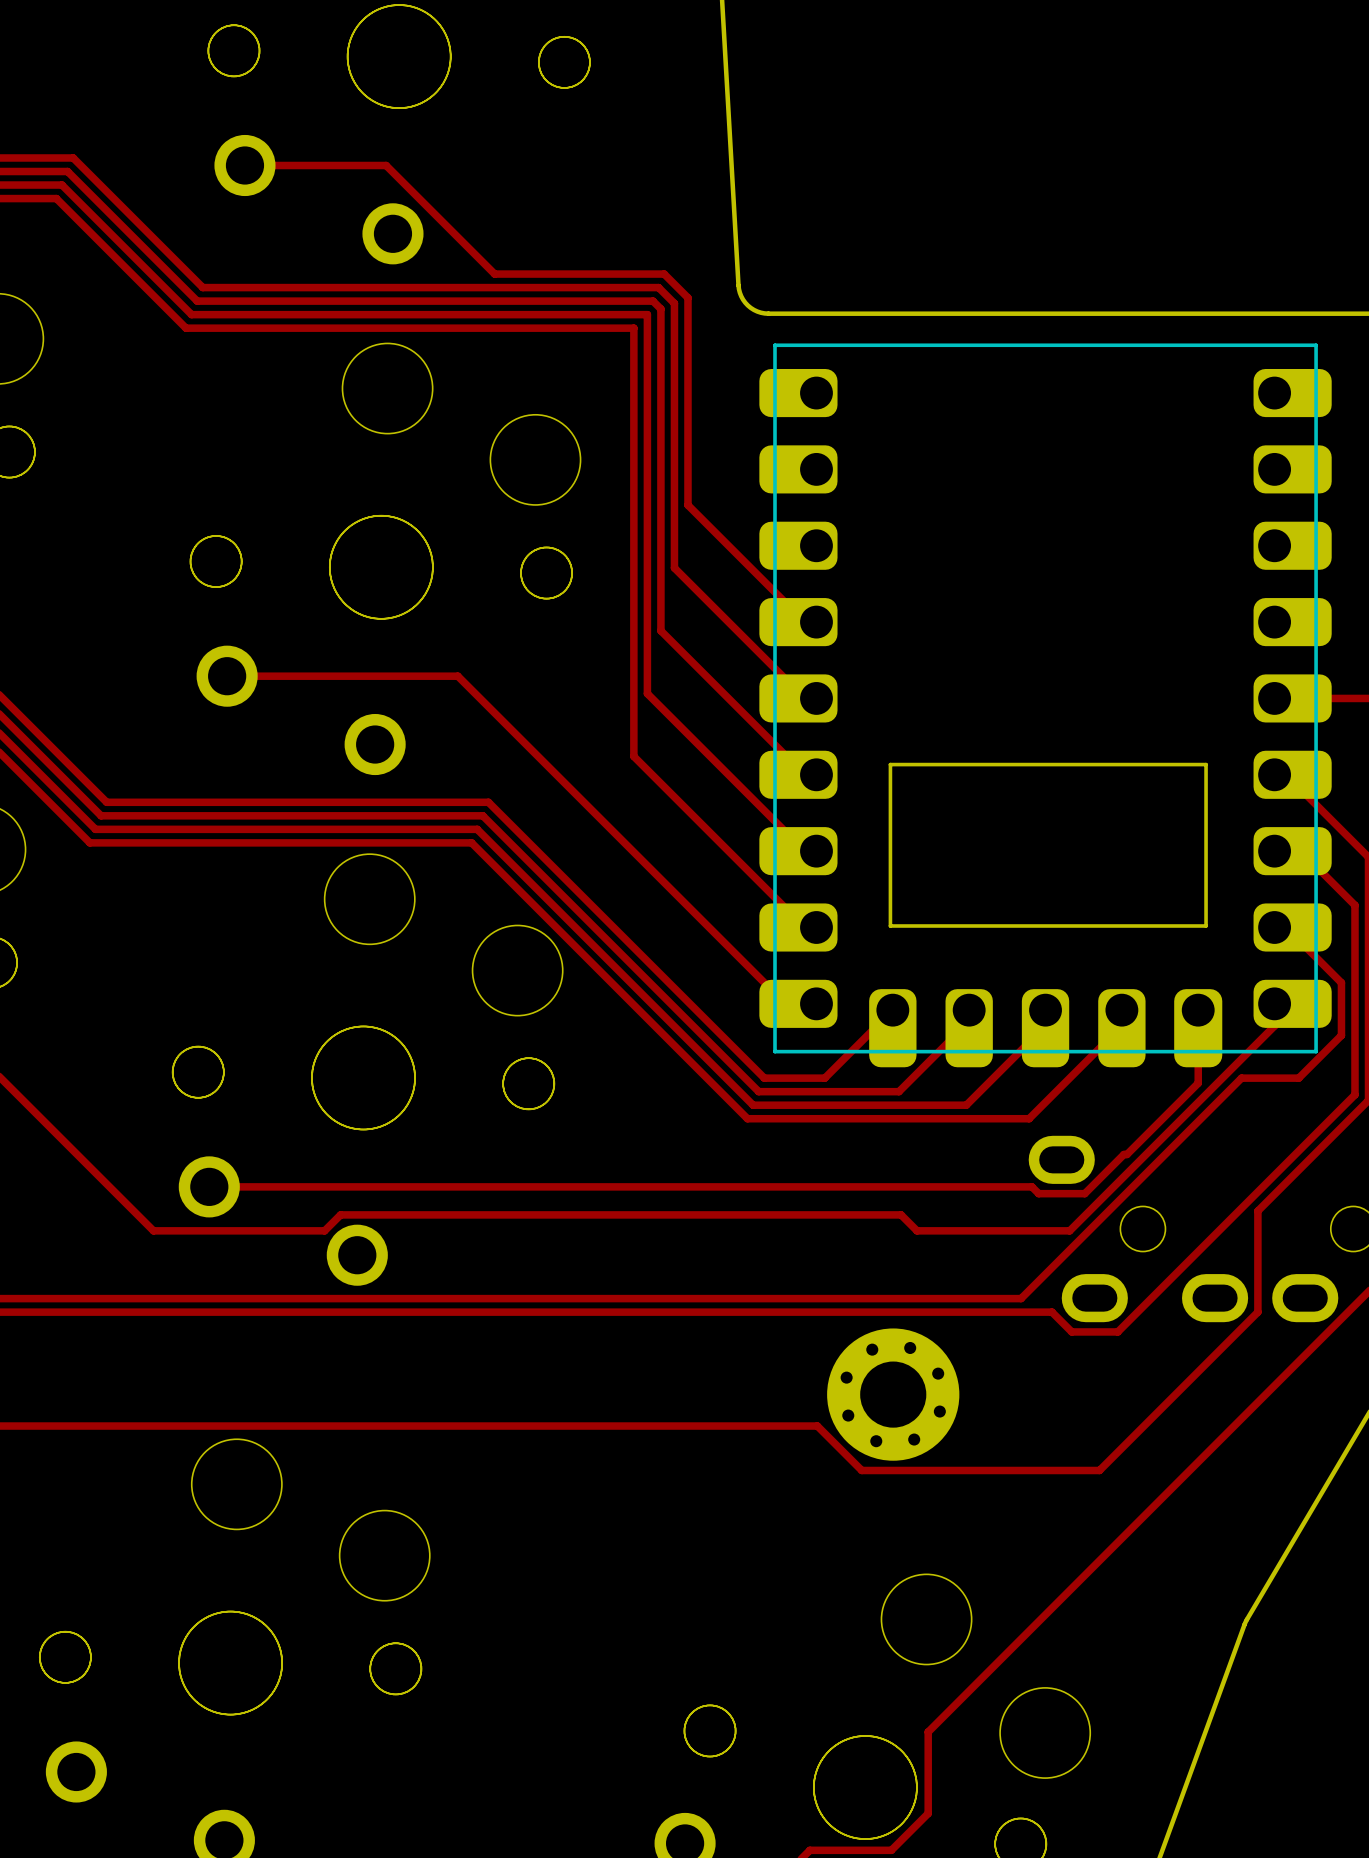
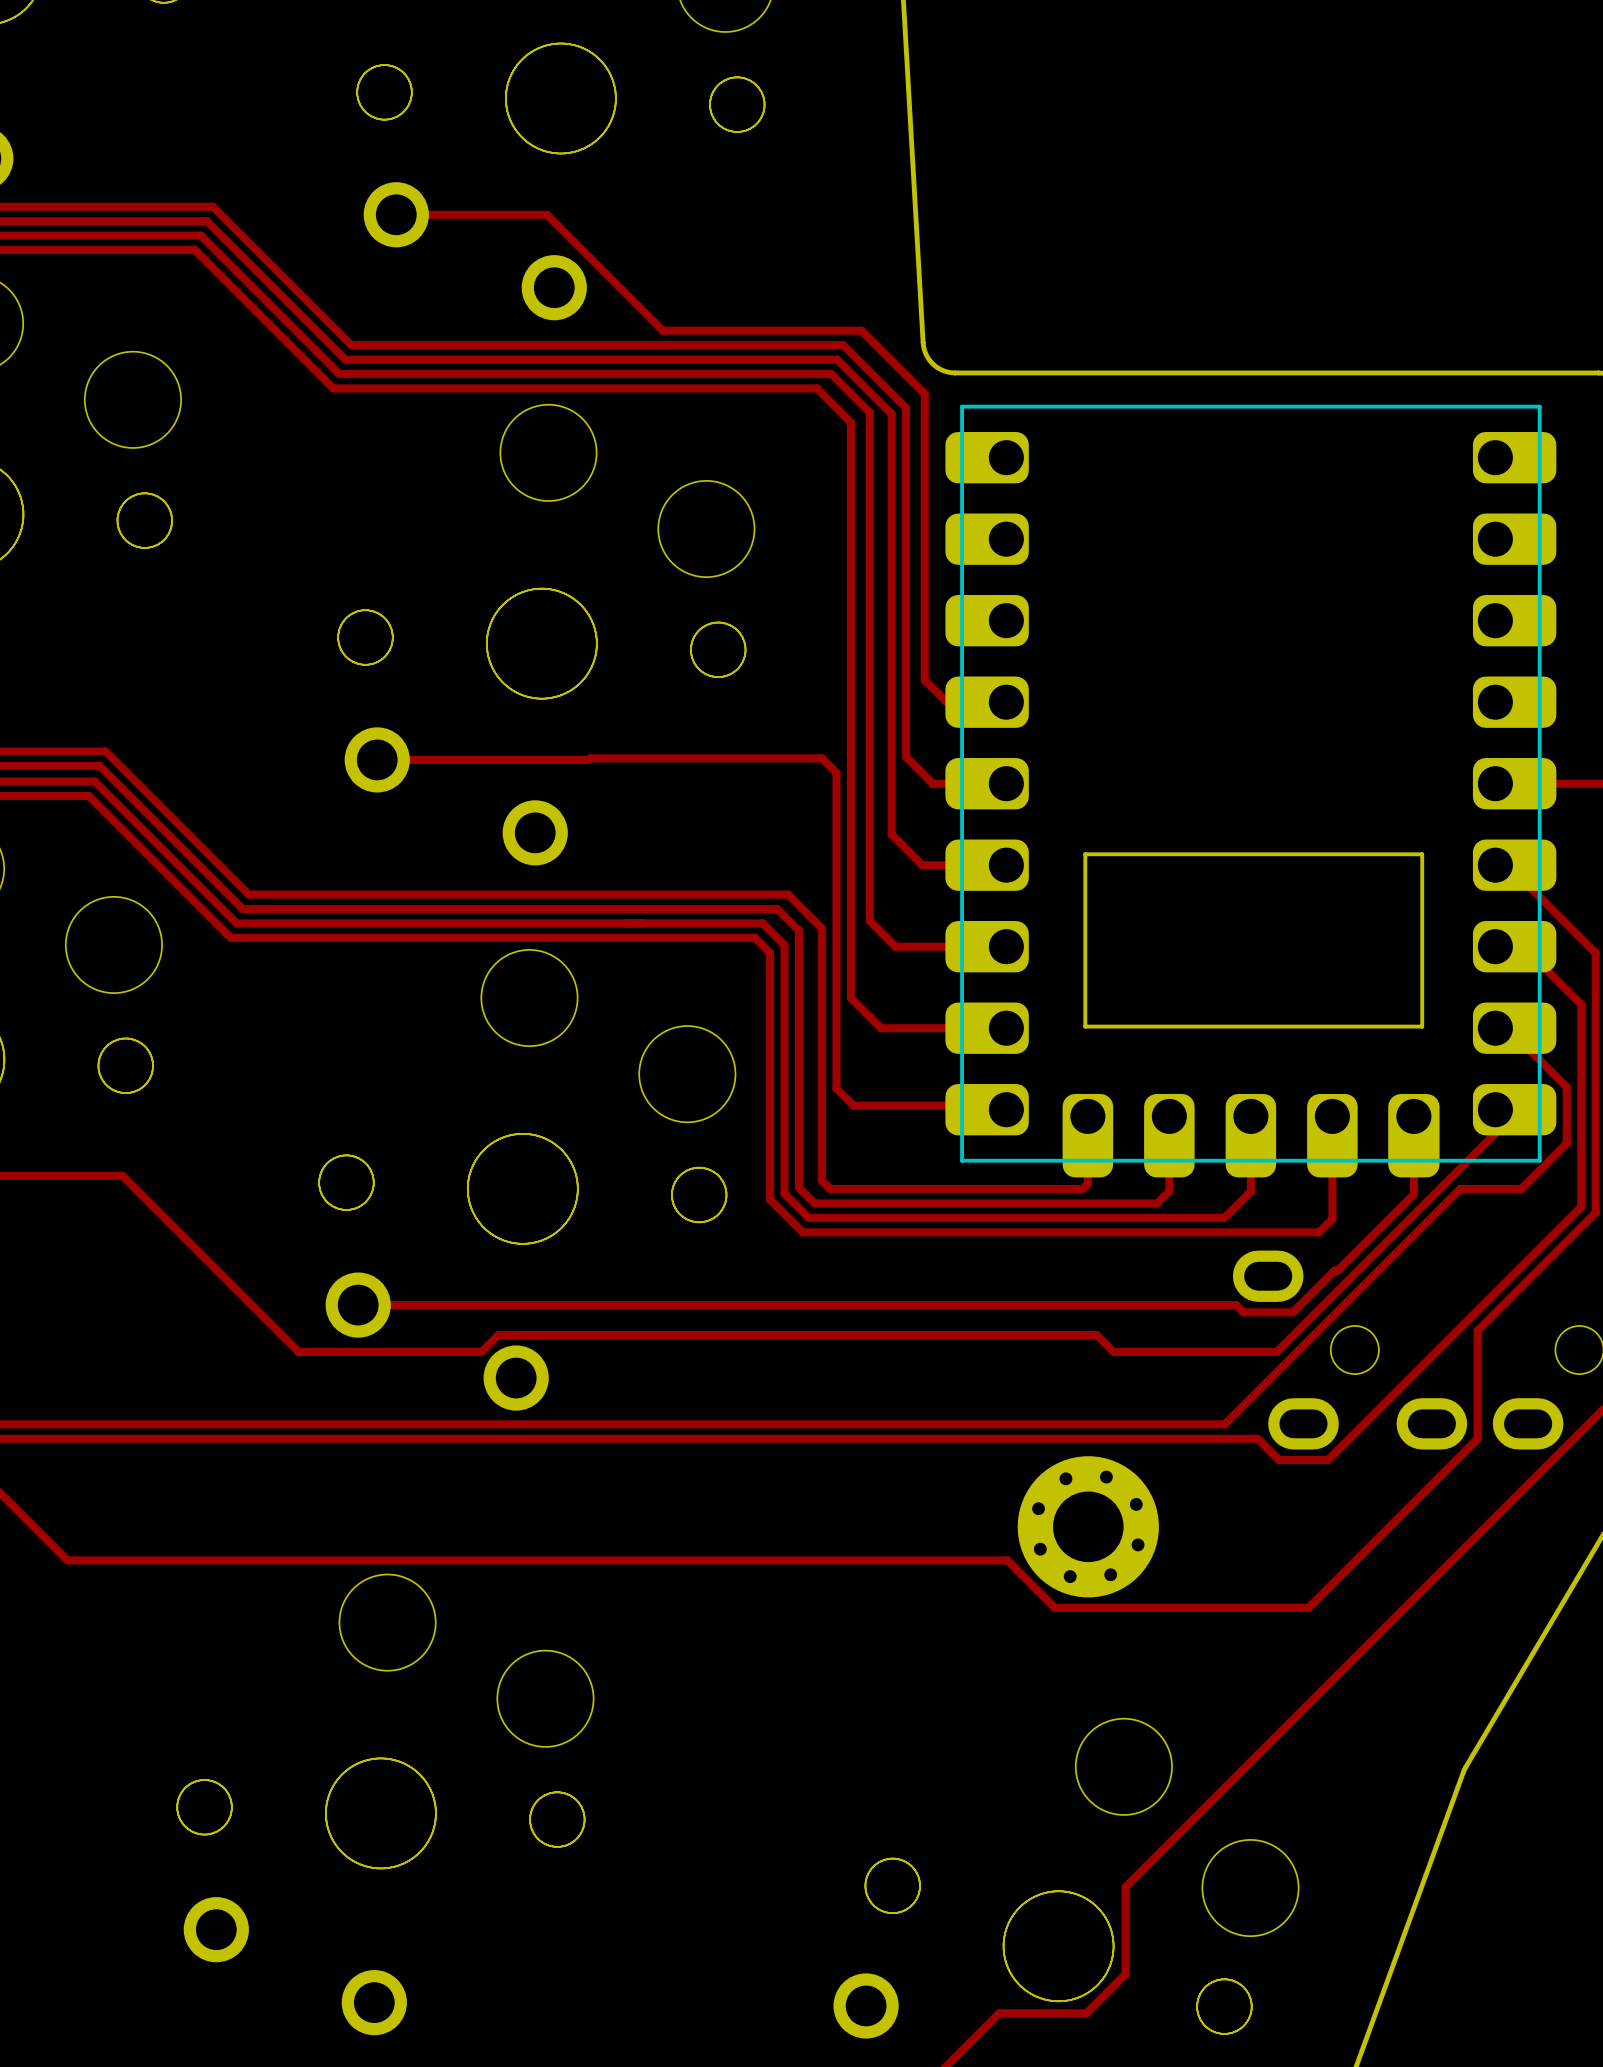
track: (664, 274) (687, 297) (687, 505) (804, 622) -> (843, 330) (861, 330) (924, 393) (924, 680) (946, 702) (994, 702)
track: (658, 287) (674, 303) (674, 568) (804, 698) -> (837, 345) (843, 345) (906, 407) (906, 756) (932, 783) (994, 783)
track: (653, 301) (660, 309) (660, 630) (804, 774) -> (831, 359) (837, 359) (891, 413) (891, 834) (922, 865) (994, 865)
track: (647, 314) (647, 693) (804, 851) -> (825, 373) (831, 373) (869, 412) (869, 921) (895, 946) (994, 946)
track: (633, 328) (633, 756) (804, 927) -> (811, 388) (816, 388) (850, 422) (850, 998) (881, 1028) (994, 1028)
track: (425, 676) (457, 676) (785, 1003) (816, 1003) -> (588, 759) (590, 758) (822, 758) (836, 772) (836, 1088) (853, 1105) (1002, 1105) (1006, 1109)
track: (488, 802) (764, 1078) -> (656, 894) (788, 894) (822, 928) (822, 1180) (830, 1189) (950, 1189)
track: (482, 815) (758, 1091) -> (650, 908) (777, 908) (798, 930) (798, 1187) (814, 1203) (944, 1203)
track: (477, 829) (753, 1105) -> (644, 923) (762, 923) (784, 945) (784, 1193) (808, 1217) (938, 1217)
track: (471, 842) (747, 1118) -> (638, 937) (755, 937) (770, 952) (770, 1199) (802, 1232) (932, 1232)
track: (892, 1010) (824, 1078) -> (1087, 1116) (1087, 1183) (1082, 1189) (1015, 1189)
track: (969, 1021) (898, 1091) -> (1169, 1128) (1169, 1191) (1157, 1203) (1094, 1203)
track: (1045, 1026) (966, 1105) -> (1250, 1133) (1250, 1191) (1224, 1217) (1166, 1217)
track: (1121, 1026) (1029, 1118) -> (1332, 1133) (1332, 1219) (1319, 1232) (1233, 1232)

